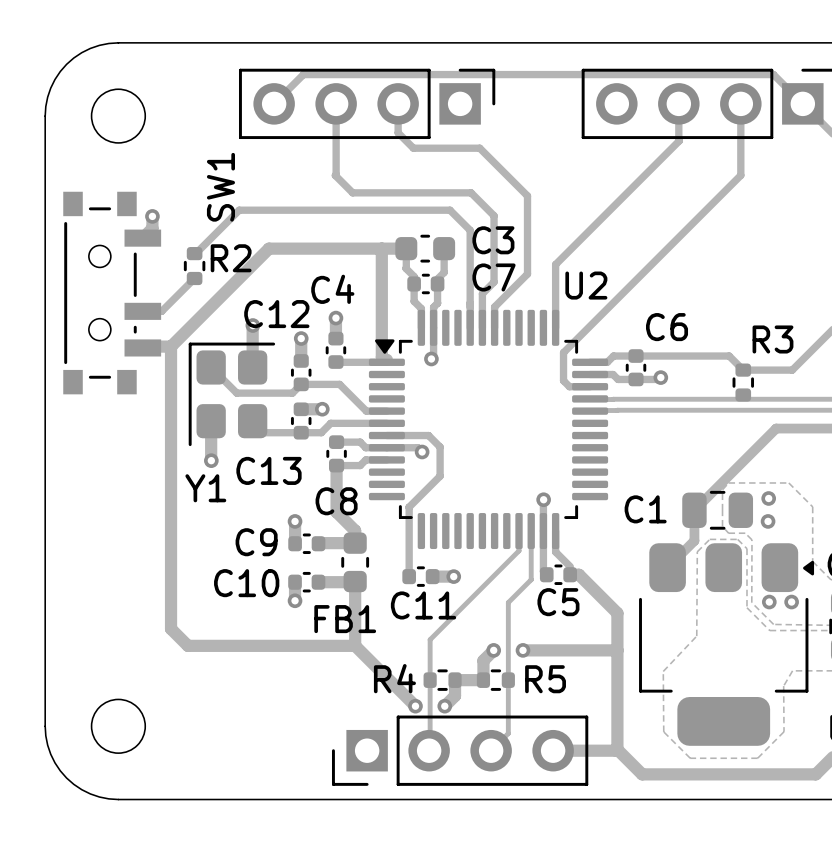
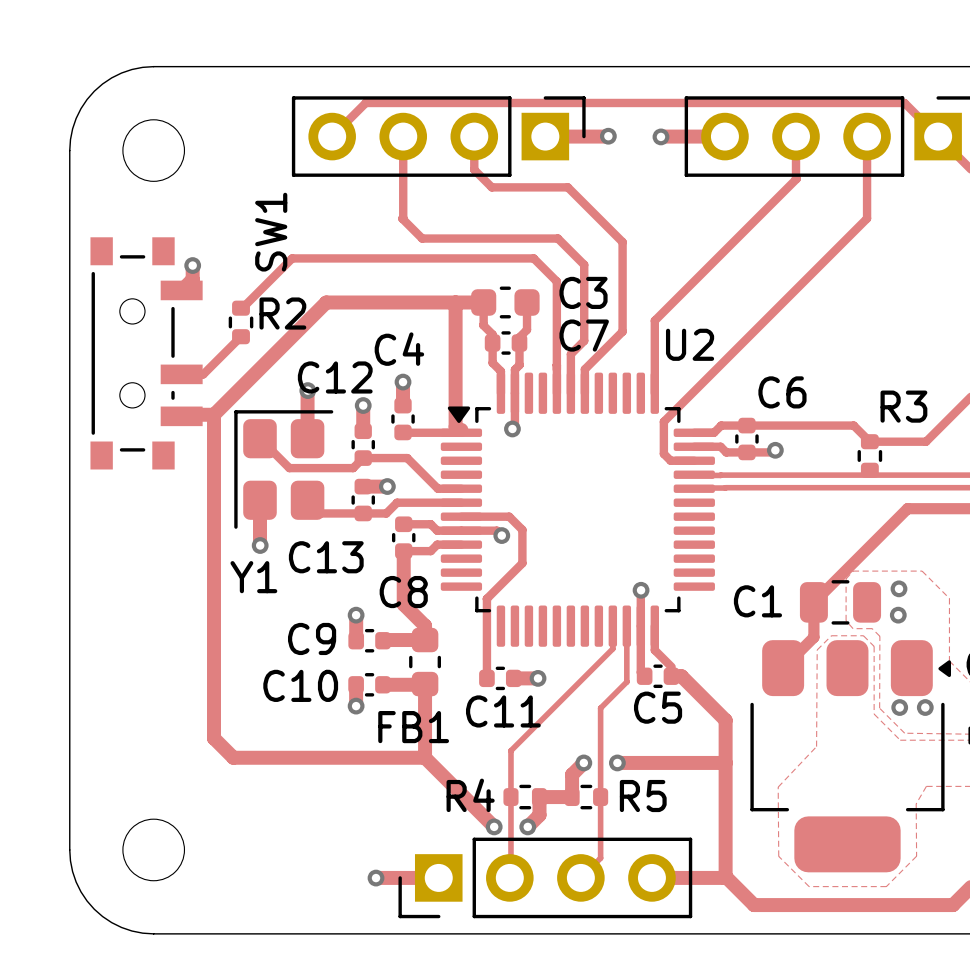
track: none -> (545, 136) (608, 136)
via: none -> (608, 136)
track: none -> (661, 136) (724, 136)
via: none -> (660, 136)
track: none -> (376, 877) (438, 877)
via: none -> (376, 878)

